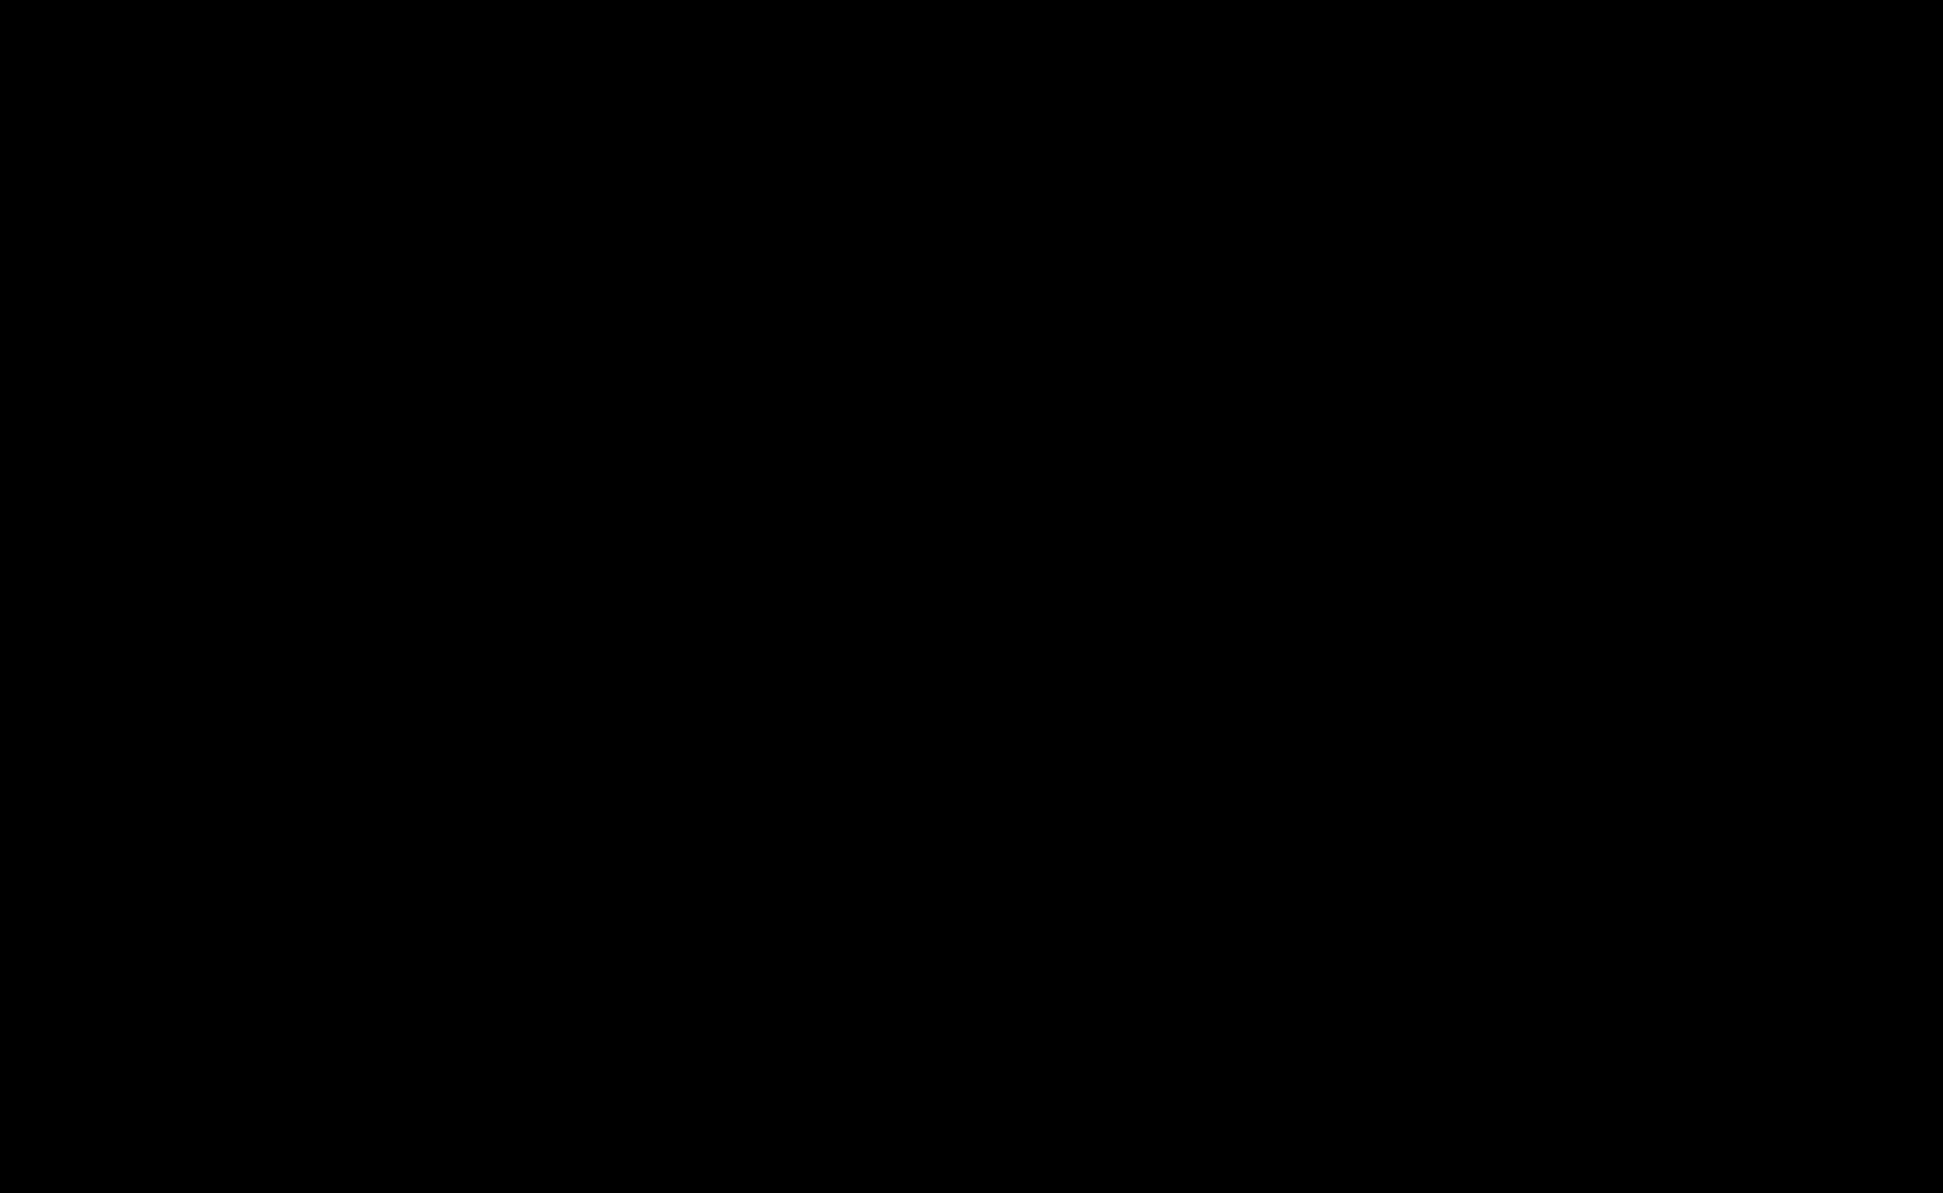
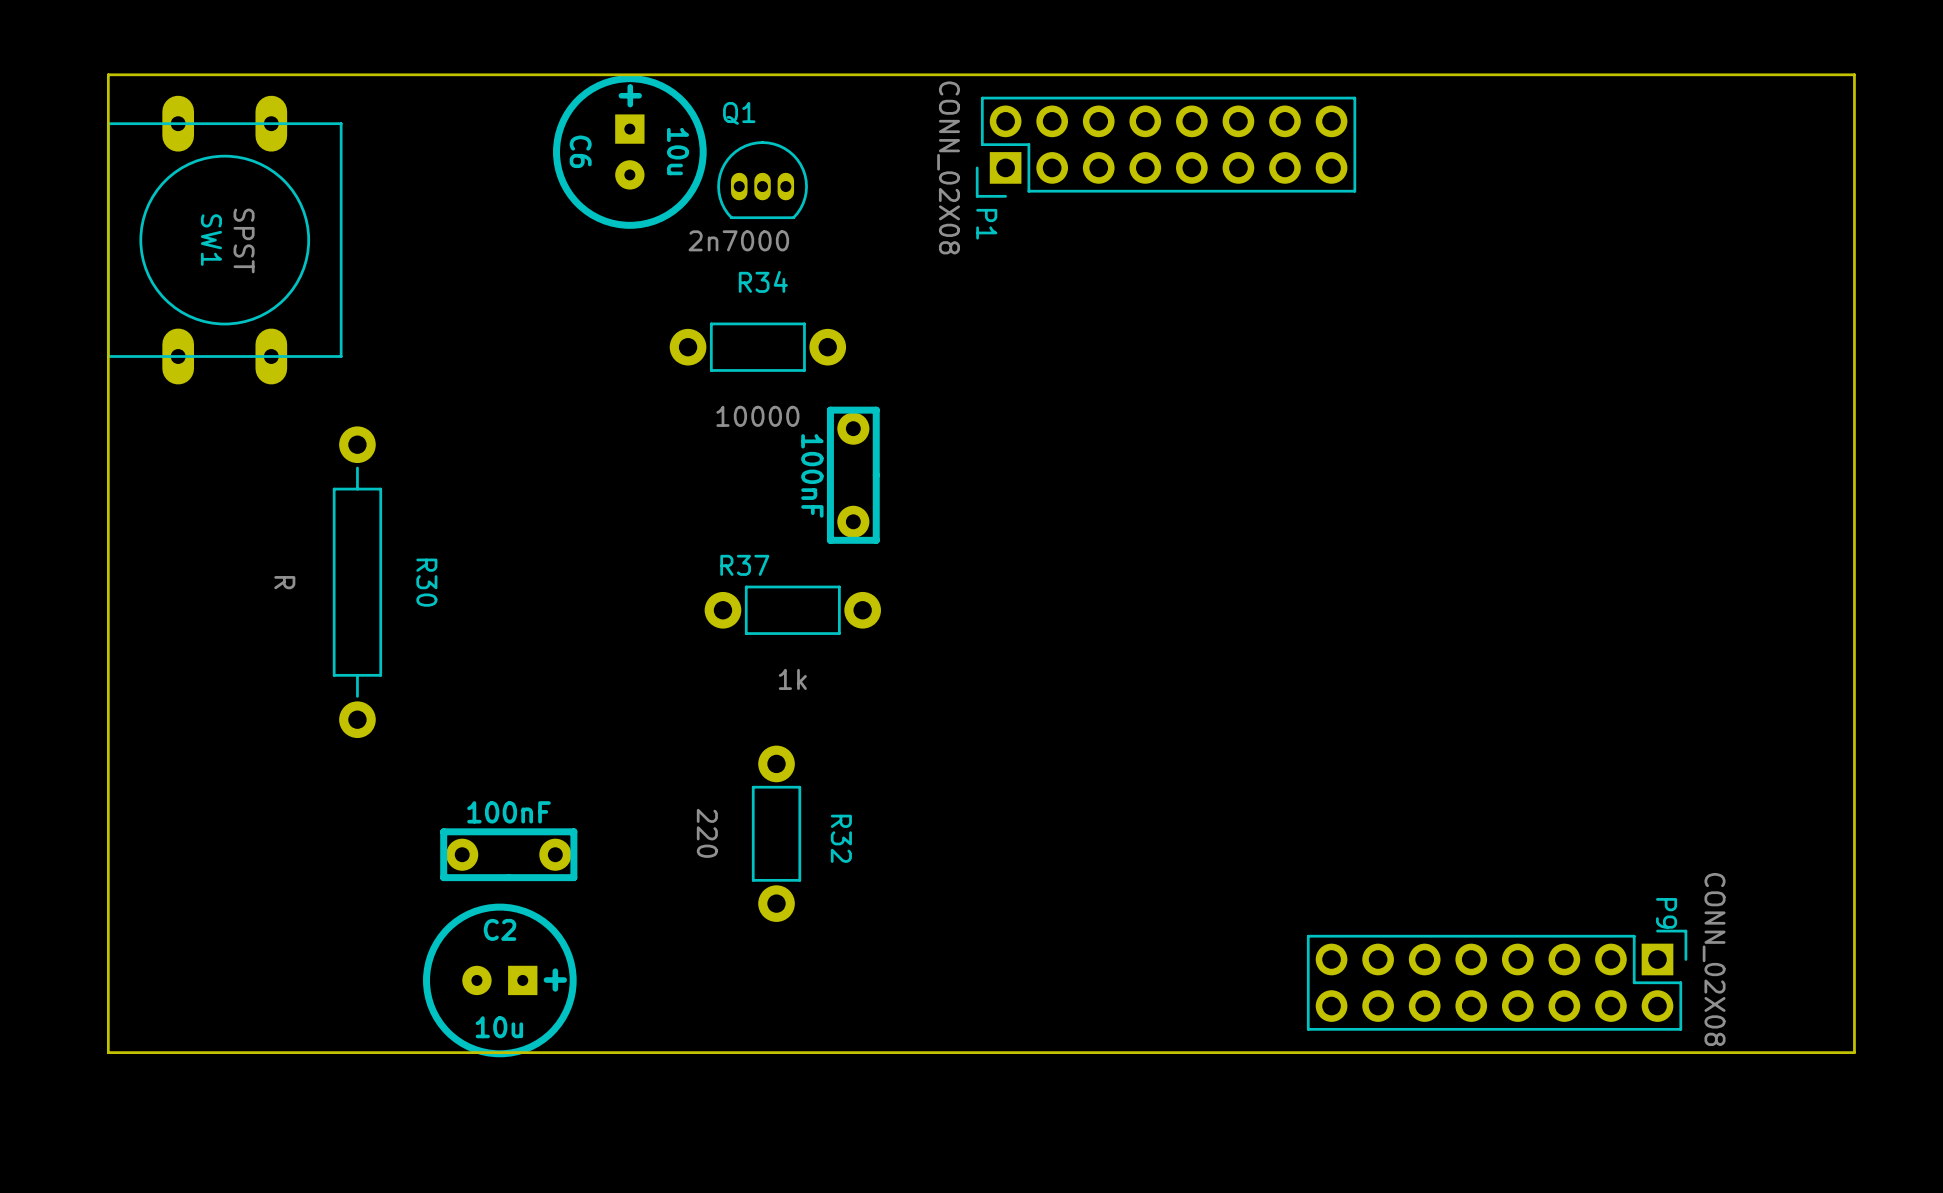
board edge: none -> (1854, 74) (108, 74) (108, 1052) (1854, 1052) (1854, 74)
P1: none -> CONN_02X08 (1166, 147)
C6: none -> 10u (629, 151)
Q1: none -> 2n7000 (762, 180)
SW1: none -> SPST (224, 240)
R34: none -> 10000 (757, 347)
part: none -> 100nF (853, 475)
R30: none -> R (357, 582)
R37: none -> 1k (792, 610)
R32: none -> 220 (776, 833)
part: none -> 100nF (508, 854)
C2: none -> 10u (499, 980)
P9: none -> CONN_02X08 (1497, 980)

